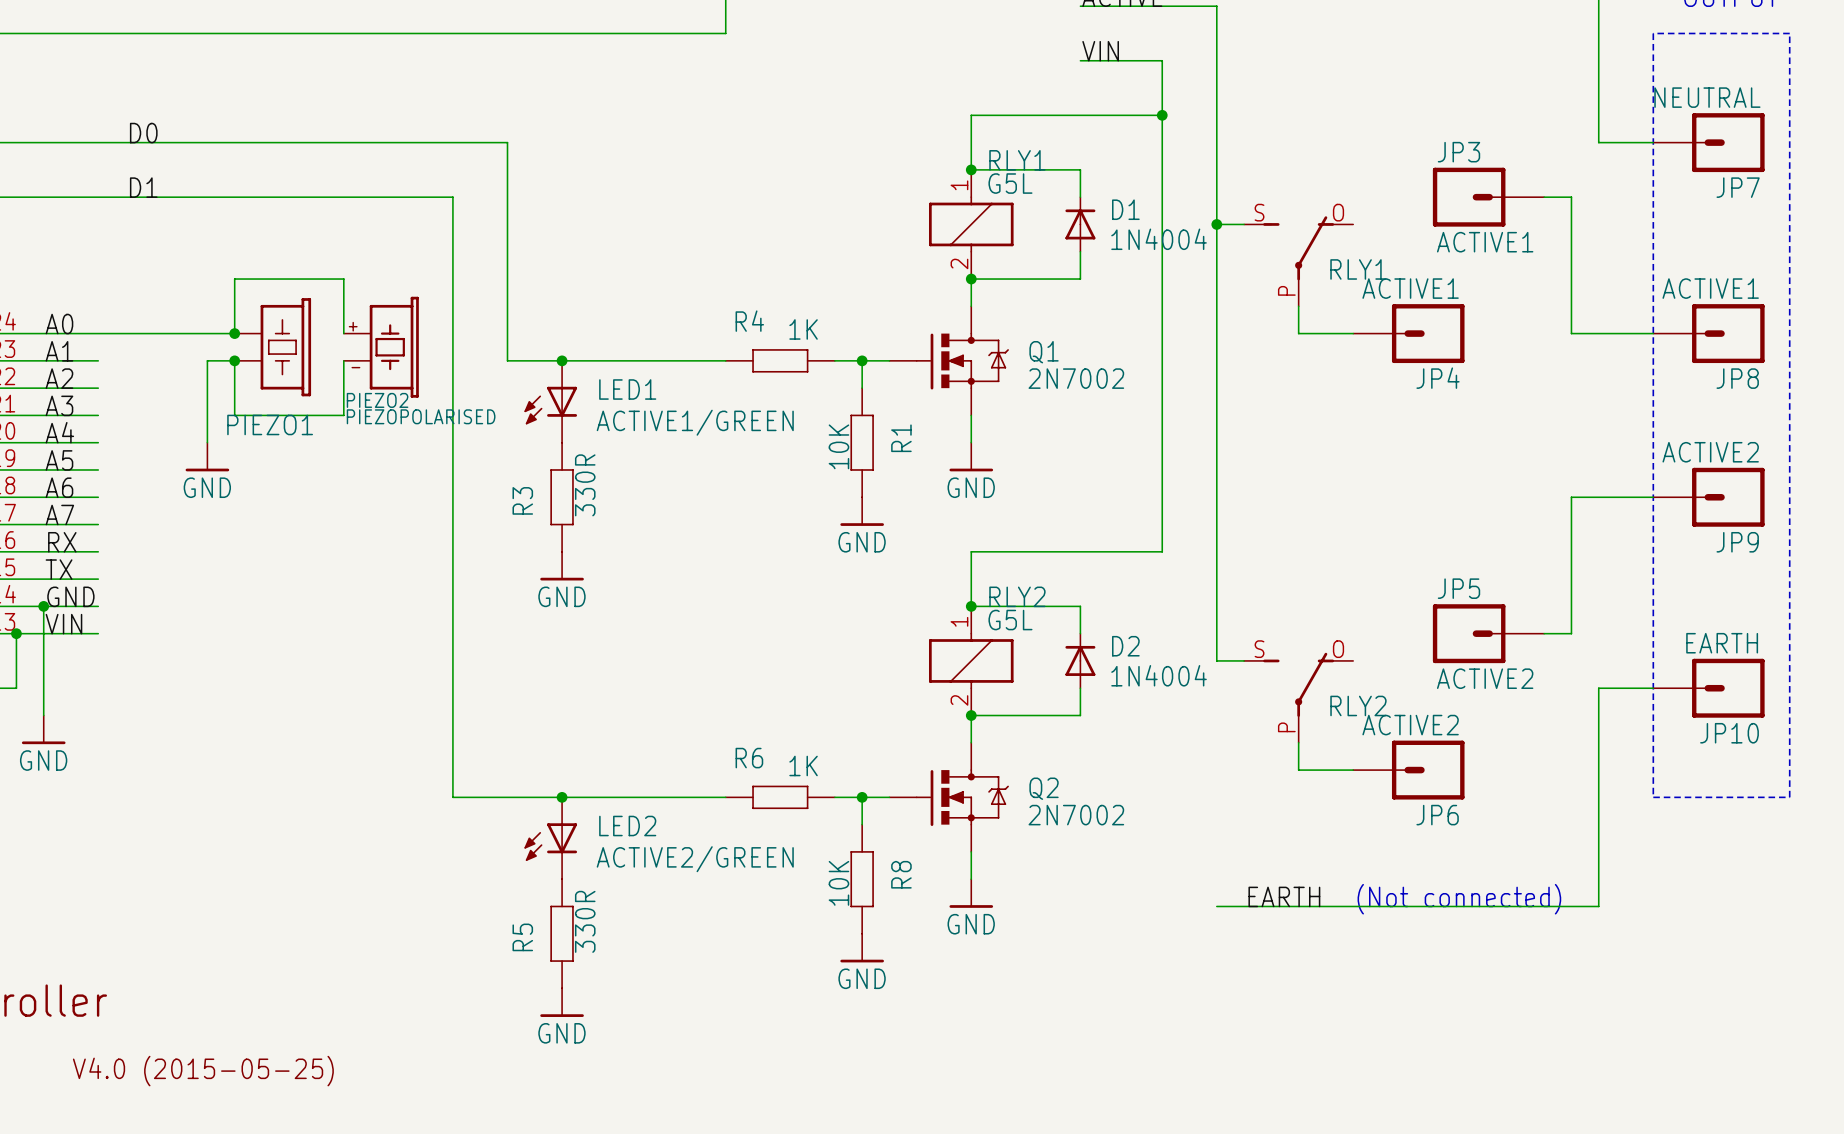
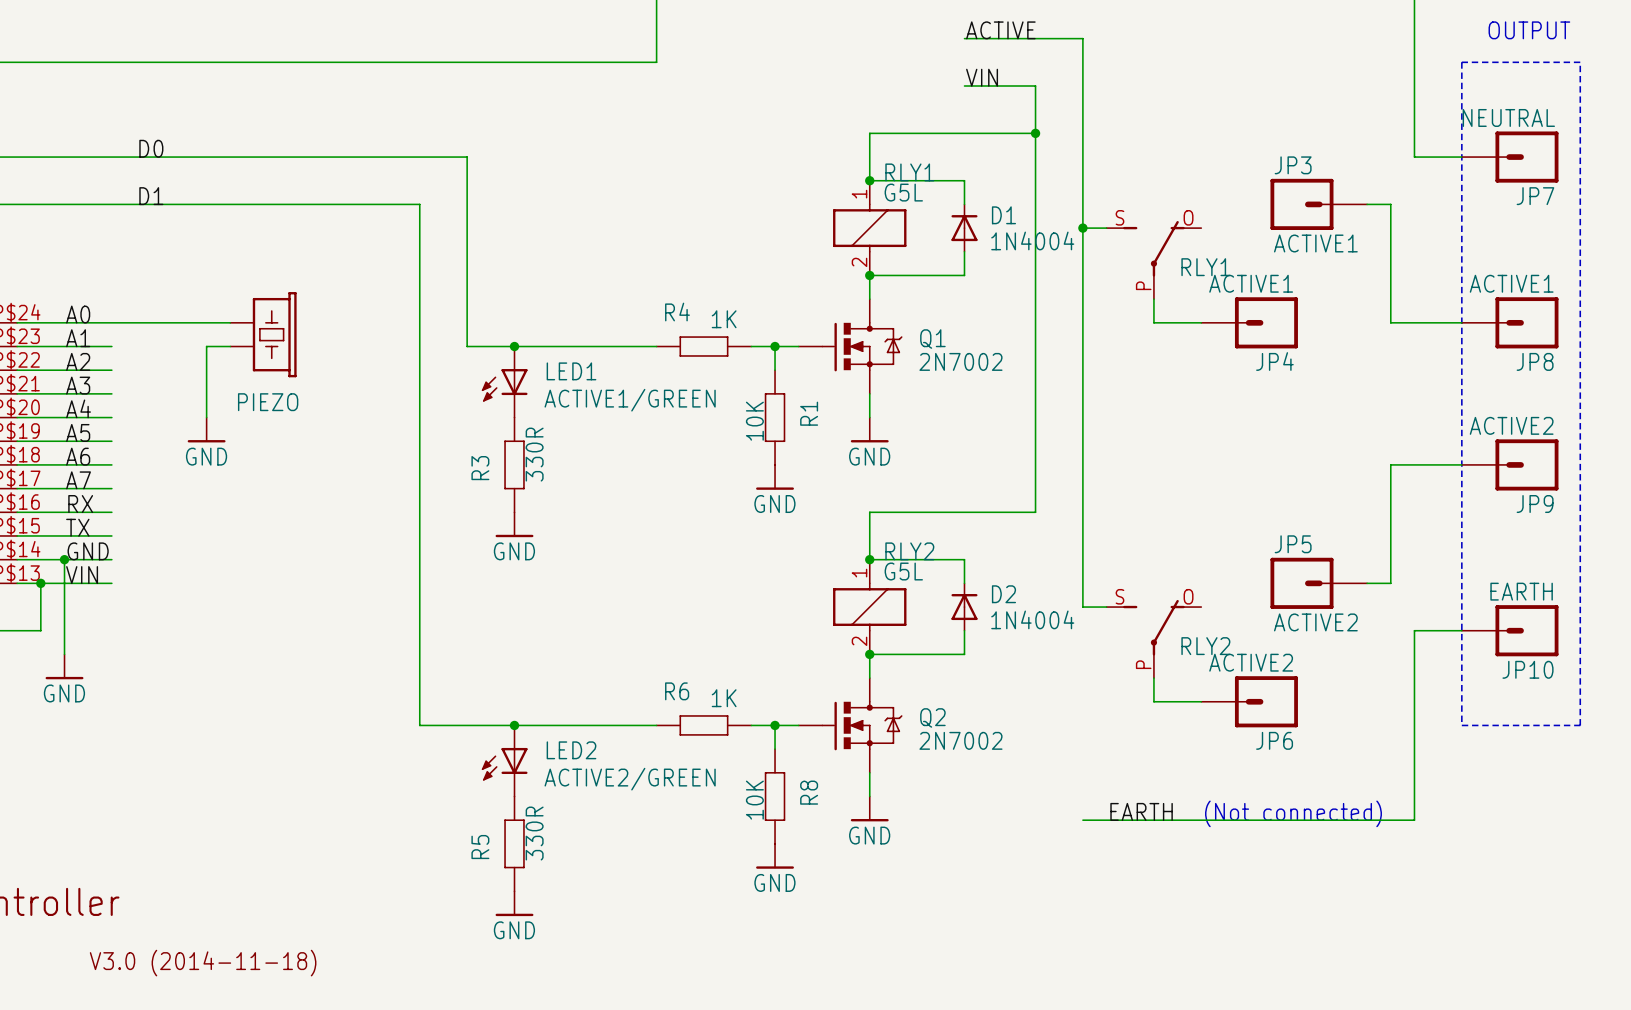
wire: (234, 333) (234, 279) (343, 279) (343, 333) -> none
junction: (234, 333) -> none
PIEZO2: PIEZOPOLARISED (381, 347) -> none
wire: (234, 360) (234, 415) (343, 415) (343, 360) -> none
junction: (234, 360) -> none
PIEZO1 name: PIEZO1 (270, 424) -> PIEZO (268, 402)
text: V4.0 (2015-05-25) (203, 1071) -> V3.0 (2014-11-18) (203, 963)

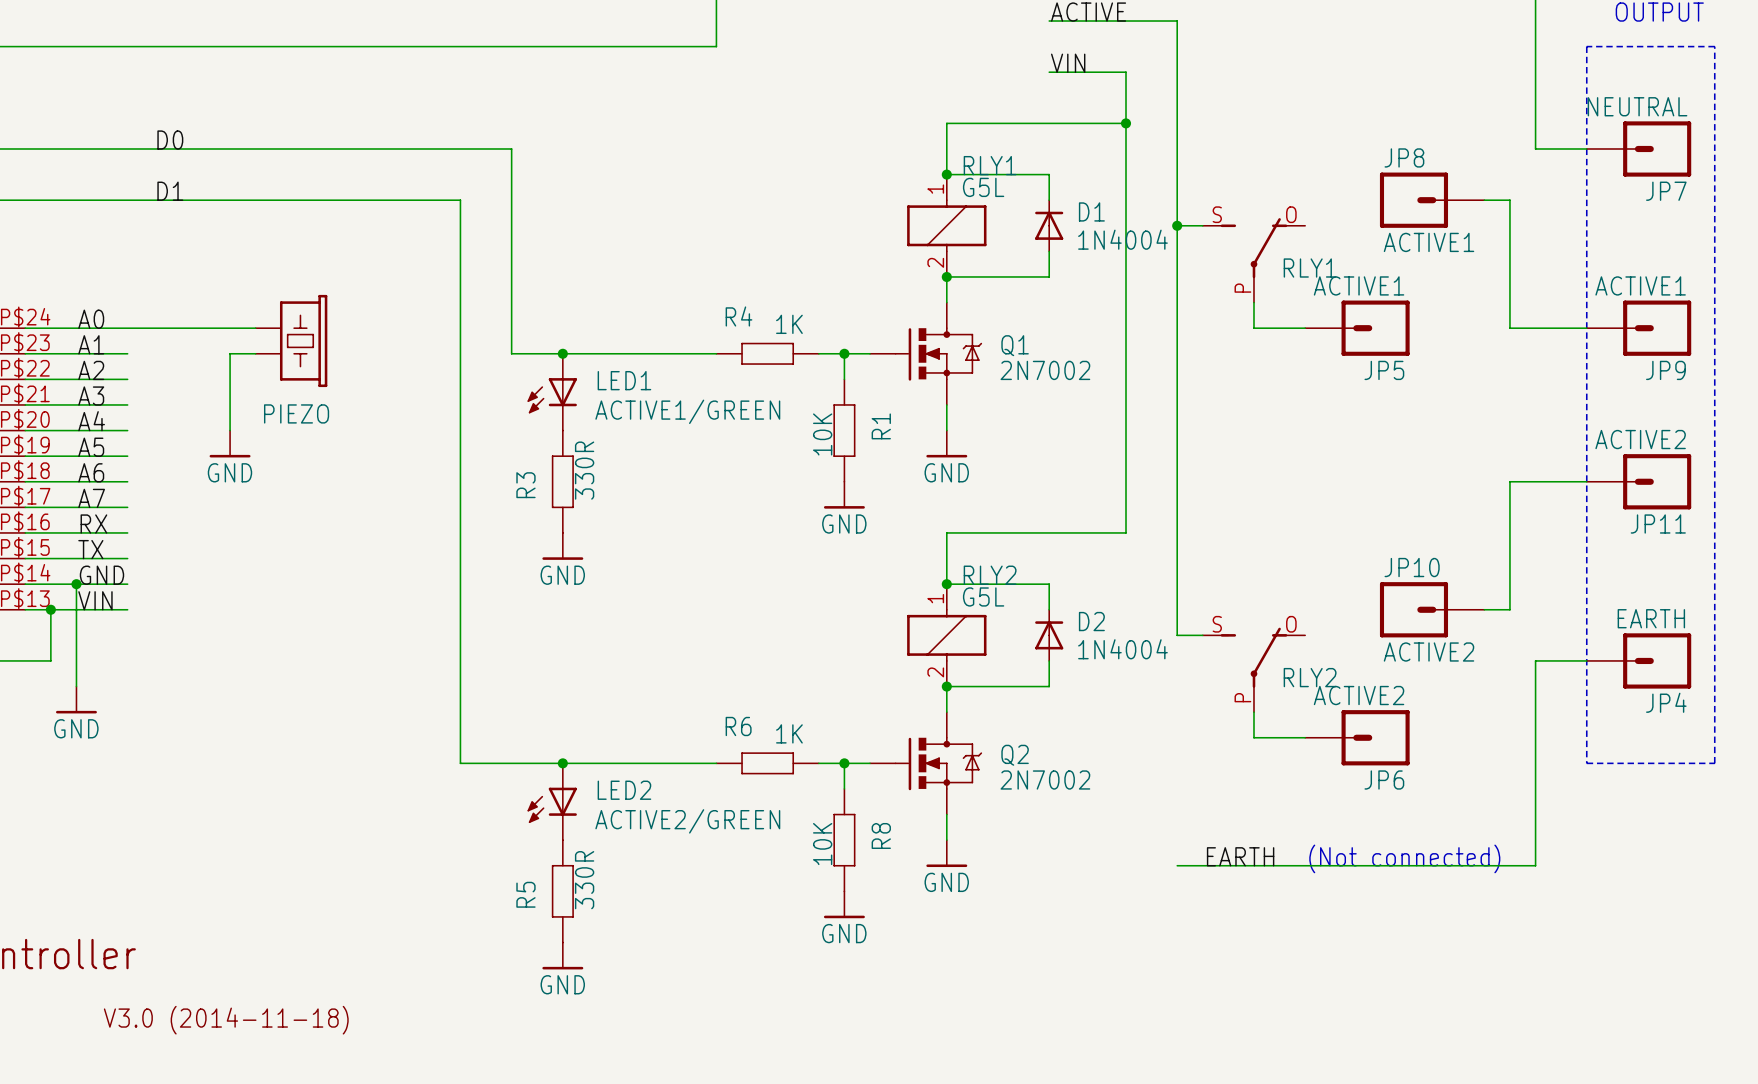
JP3 name: JP3 (1293, 165) -> JP8 (1404, 157)
JP4 name: JP4 (1274, 361) -> JP5 (1384, 370)
JP8 name: JP8 (1535, 361) -> JP9 (1665, 370)
JP9 name: JP9 (1535, 504) -> JP11 (1658, 524)
JP5 name: JP5 (1293, 544) -> JP10 (1412, 567)
JP10 name: JP10 (1527, 669) -> JP4 (1666, 702)

